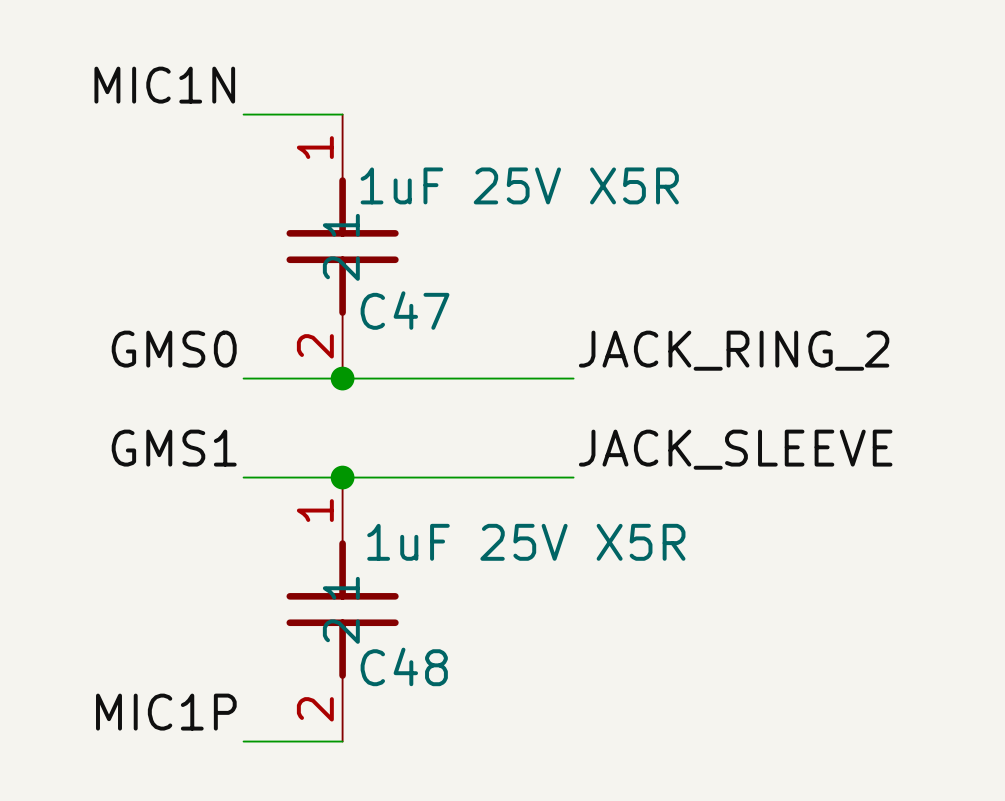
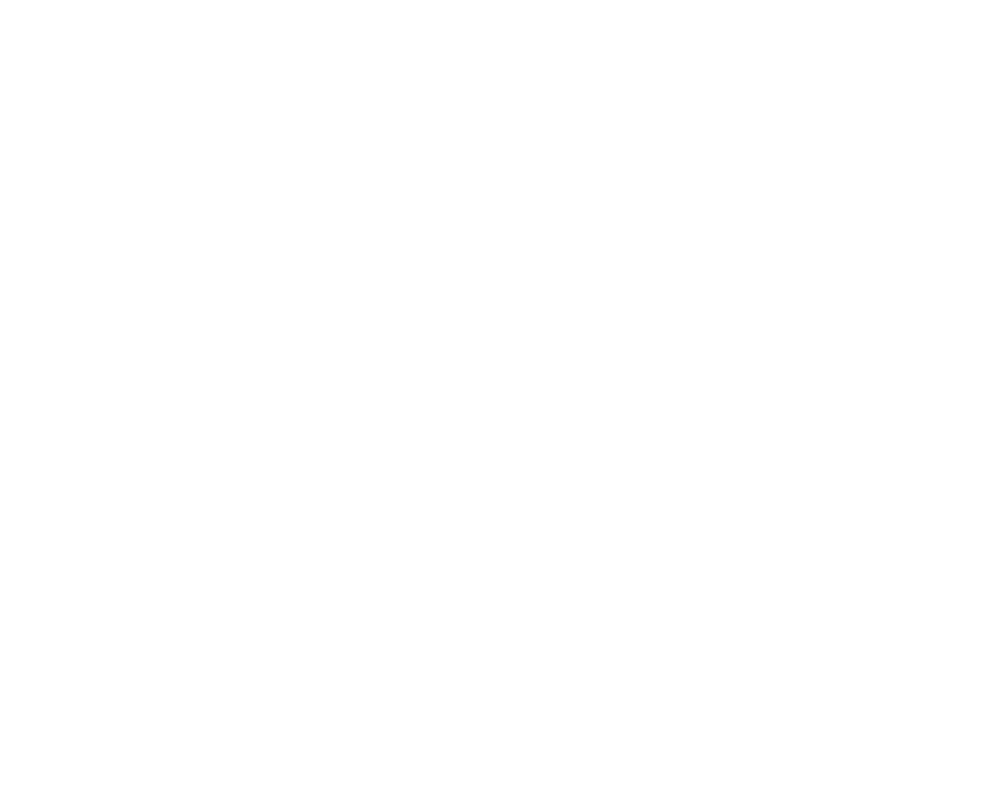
label: MIC1N (164, 85) -> none
wire: (243, 114) (342, 114) -> none
C47: 1uF 25V X5R (342, 246) -> none
label: GMS0 (174, 349) -> none
label: JACK_RING_2 (734, 350) -> none
wire: (243, 378) (573, 378) -> none
junction: (342, 378) -> none
label: GMS1 (174, 448) -> none
label: JACK_SLEEVE (735, 449) -> none
wire: (243, 477) (573, 477) -> none
junction: (342, 477) -> none
C48: 1uF 25V X5R (342, 609) -> none
label: MIC1P (166, 712) -> none
wire: (243, 741) (342, 741) -> none

